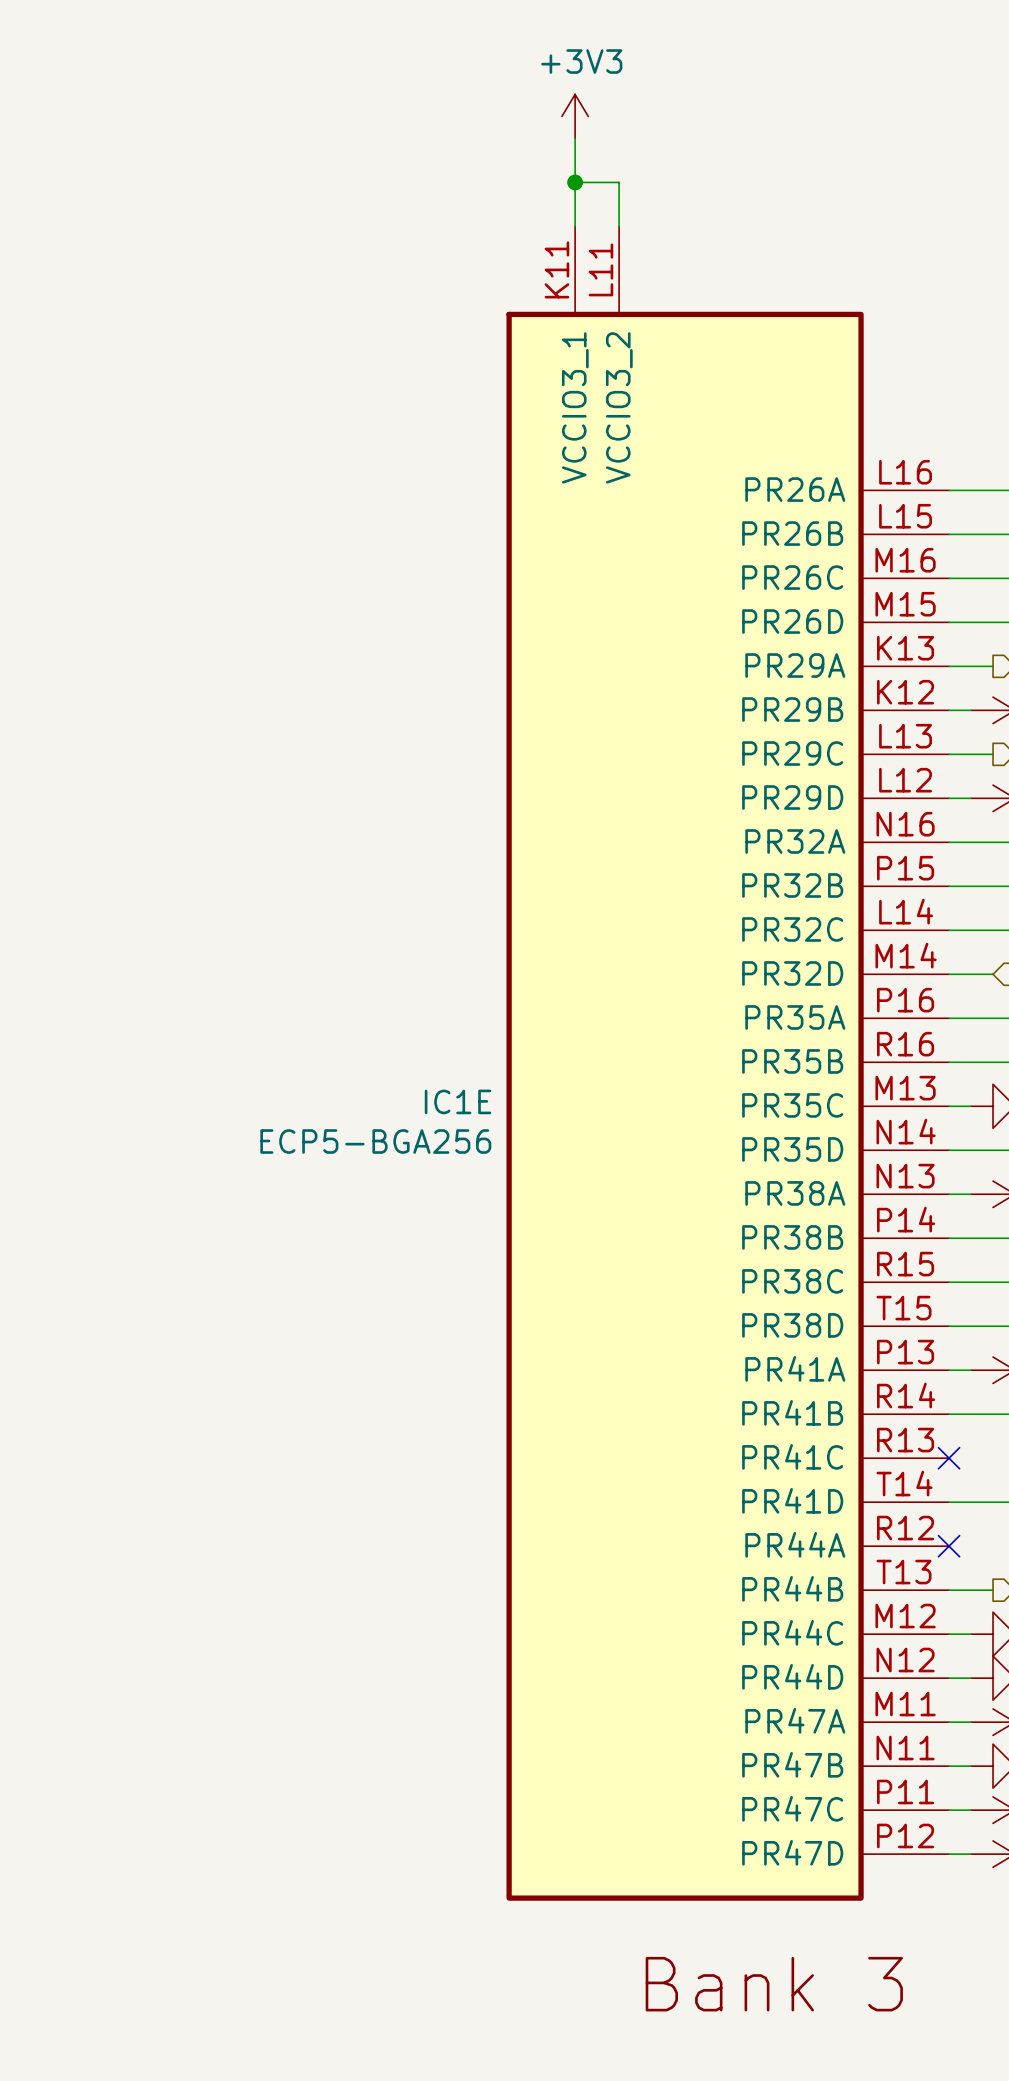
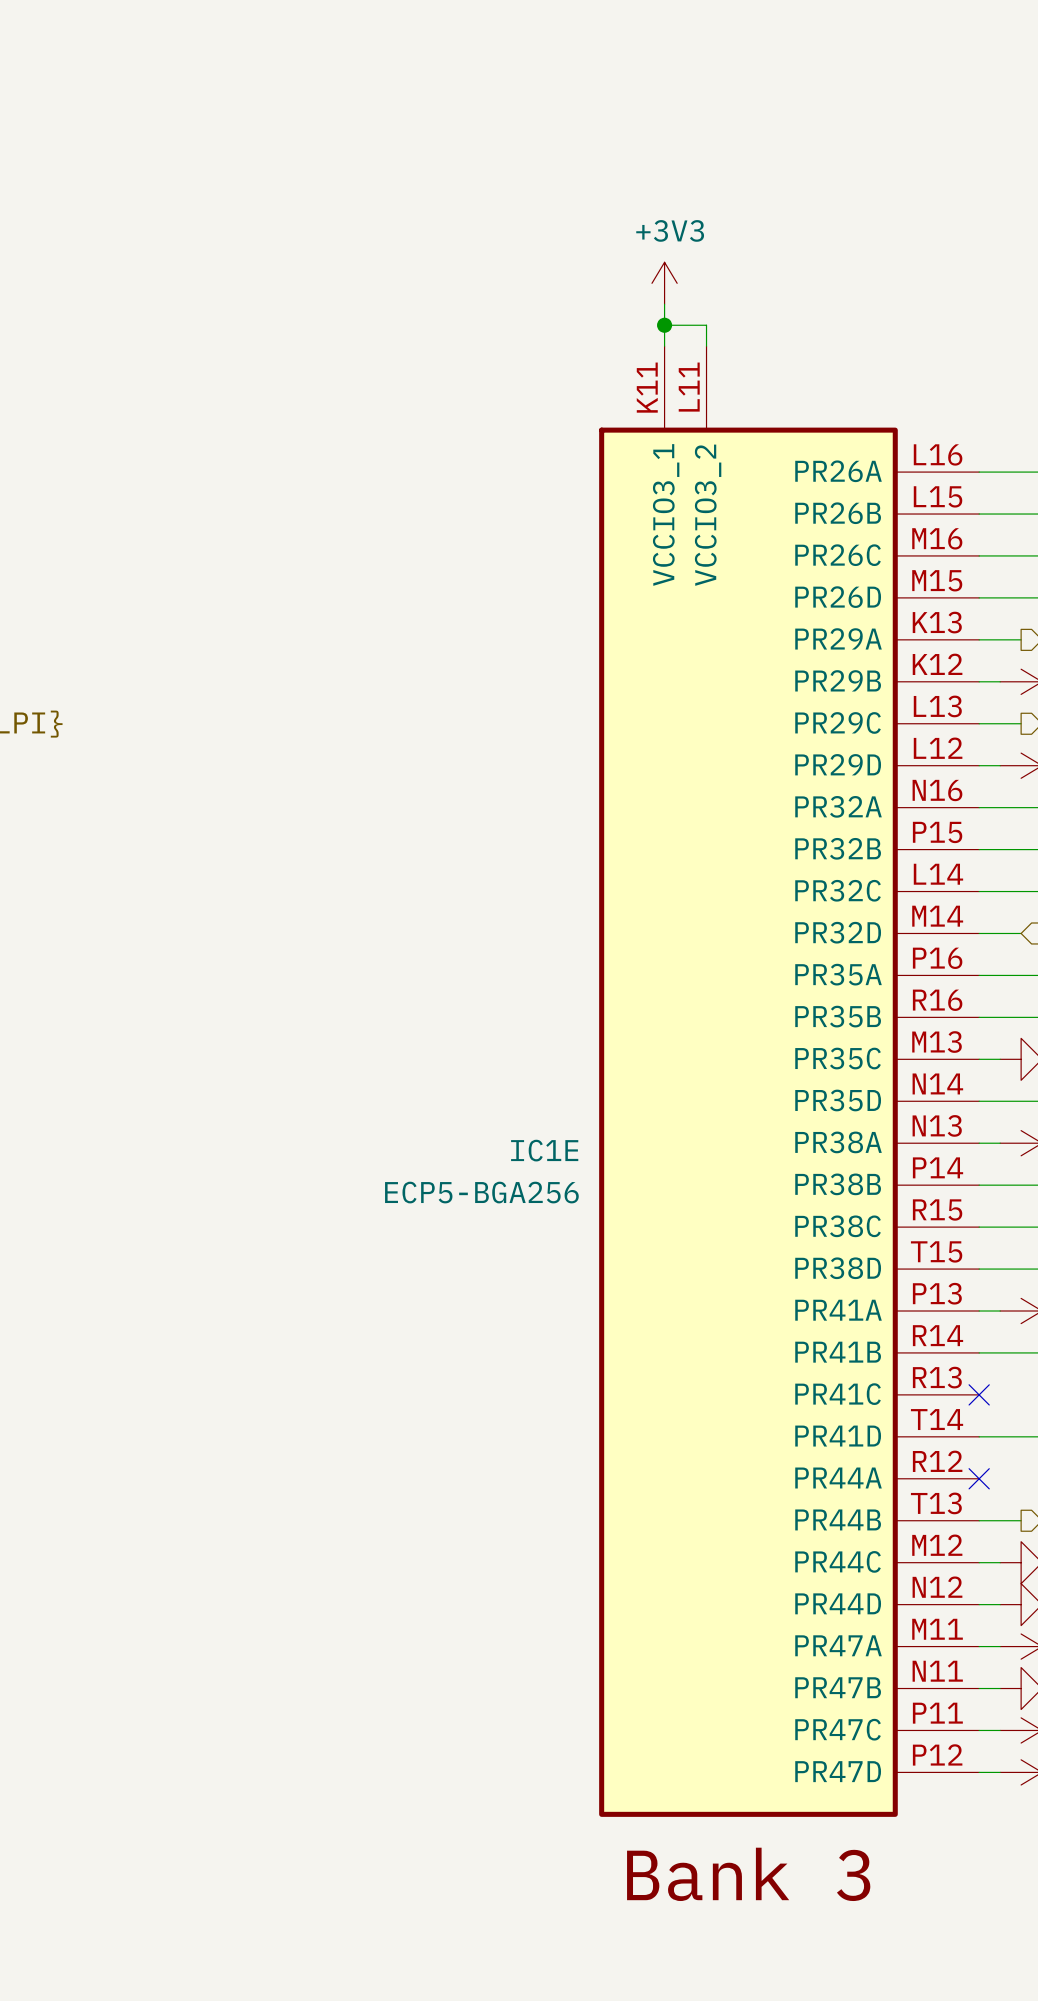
power symbol position: +3V3 (575, 116) -> +3V3 (664, 283)
wire: (575, 138) (575, 226) -> none
wire: (575, 182) (619, 182) (619, 226) -> none
junction: (575, 182) -> none
IC1E symbol: [506, 226, 950, 1901] -> [599, 346, 980, 1817]
junction: none -> (664, 325)
IC1E name position: IC1E (458, 1101) -> IC1E (544, 1150)
IC1E value position: ECP5-BGA256 (375, 1141) -> ECP5-BGA256 (481, 1192)

